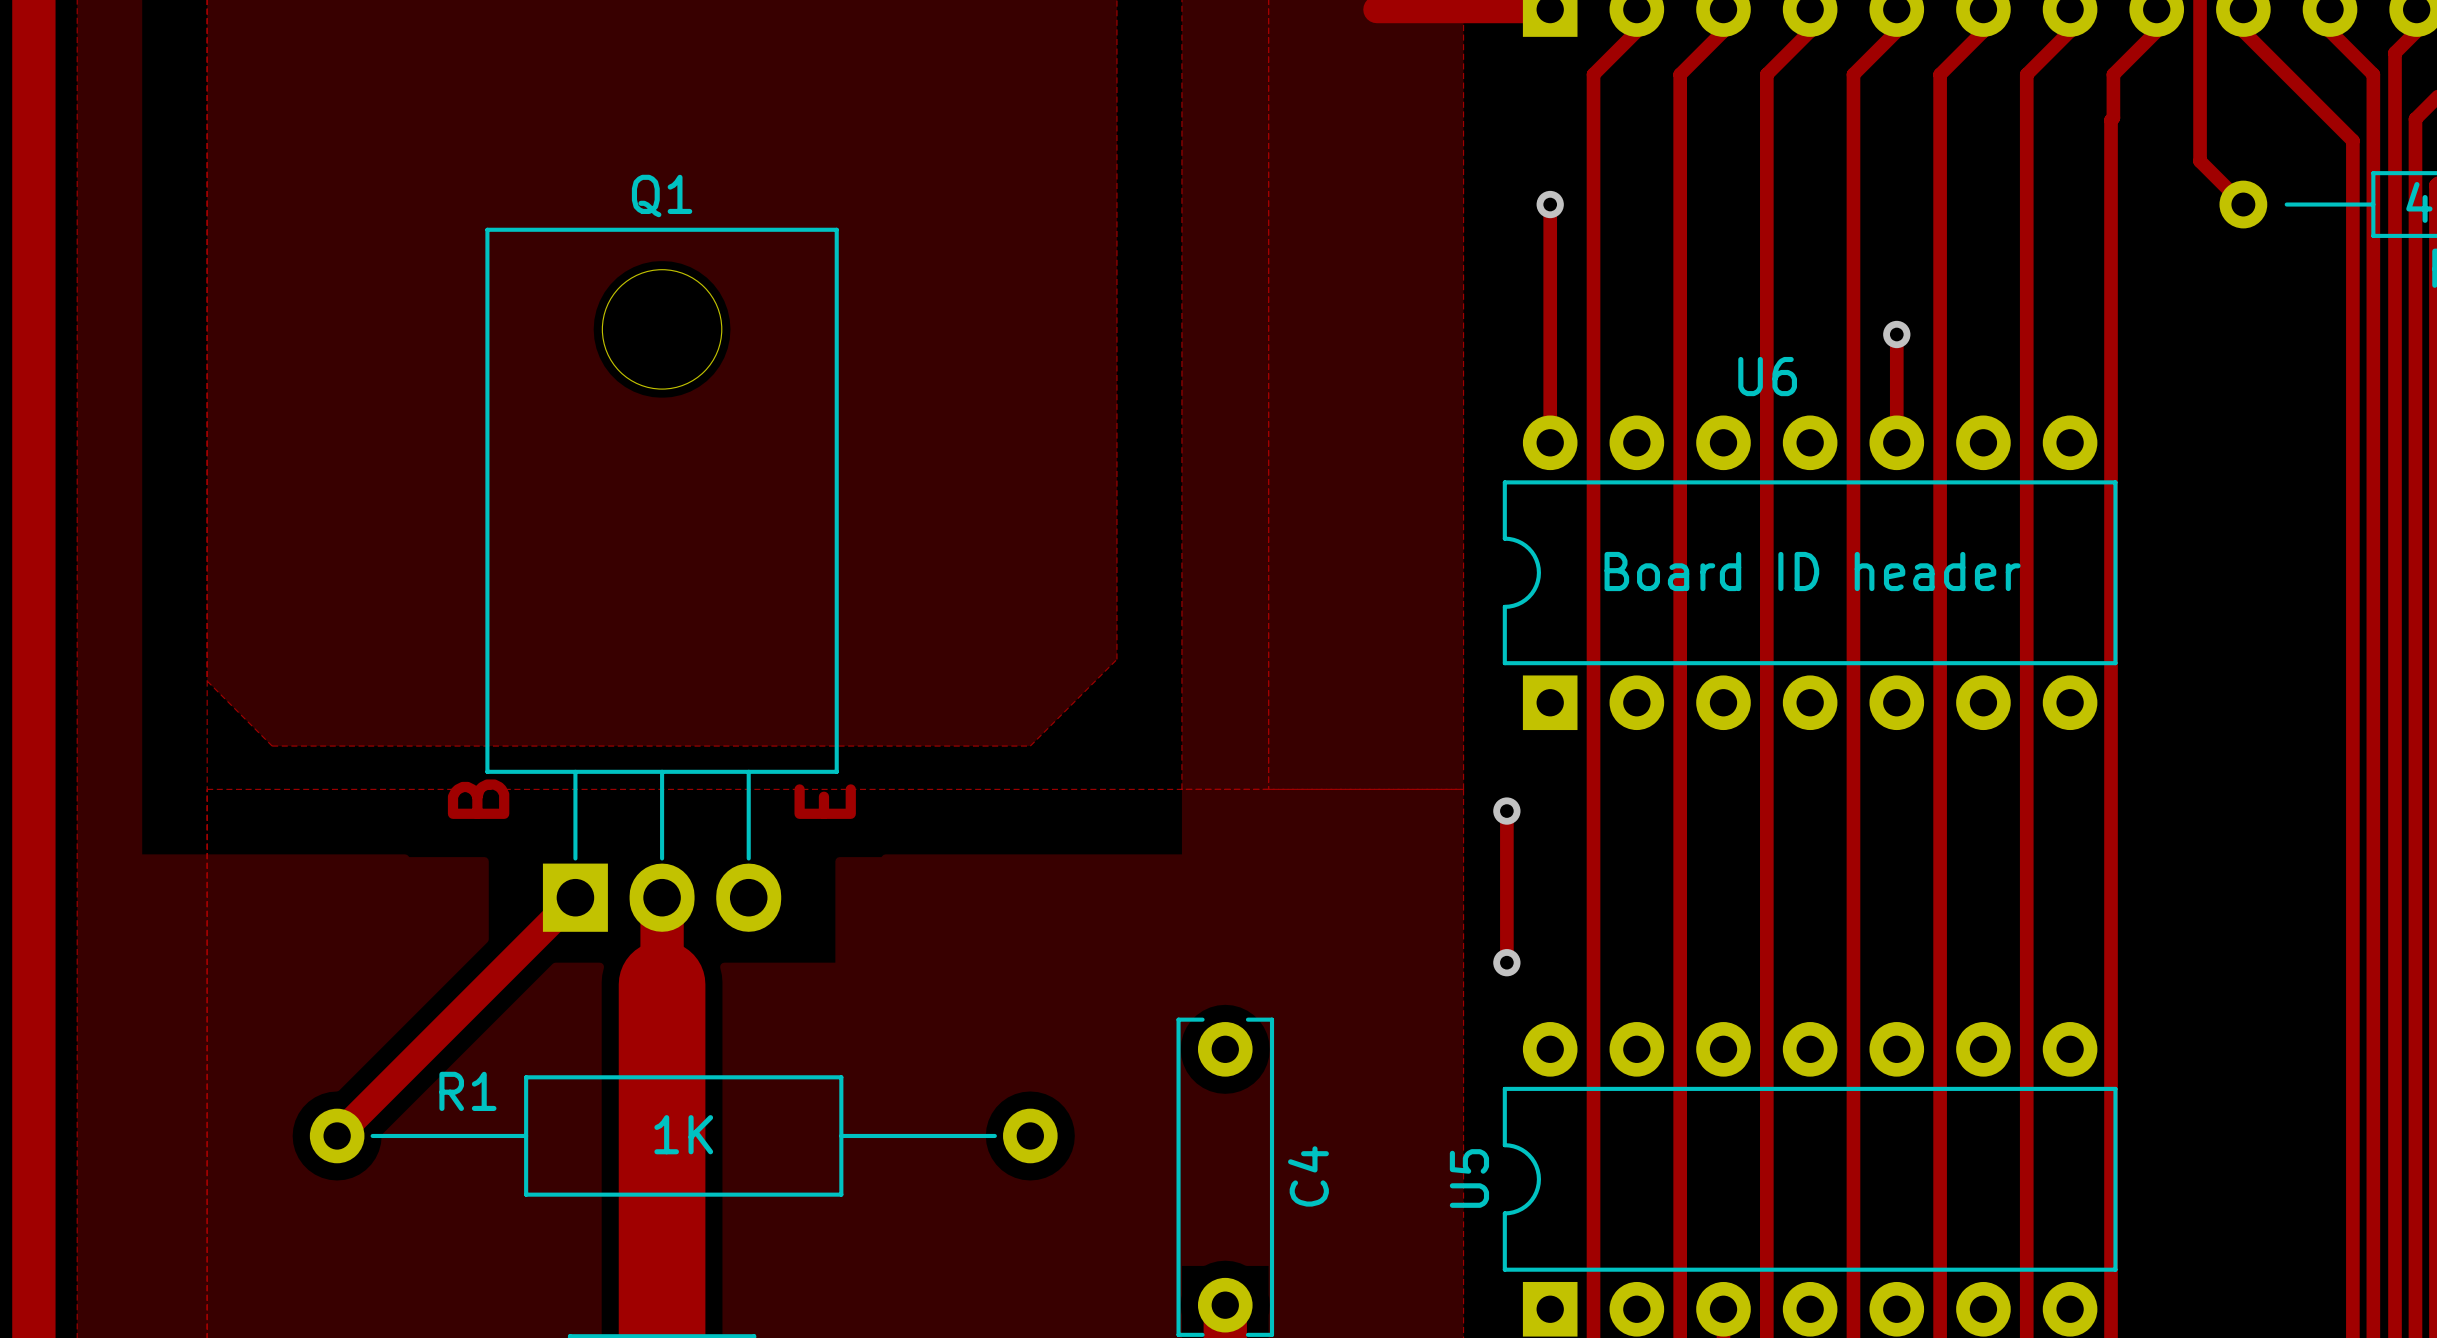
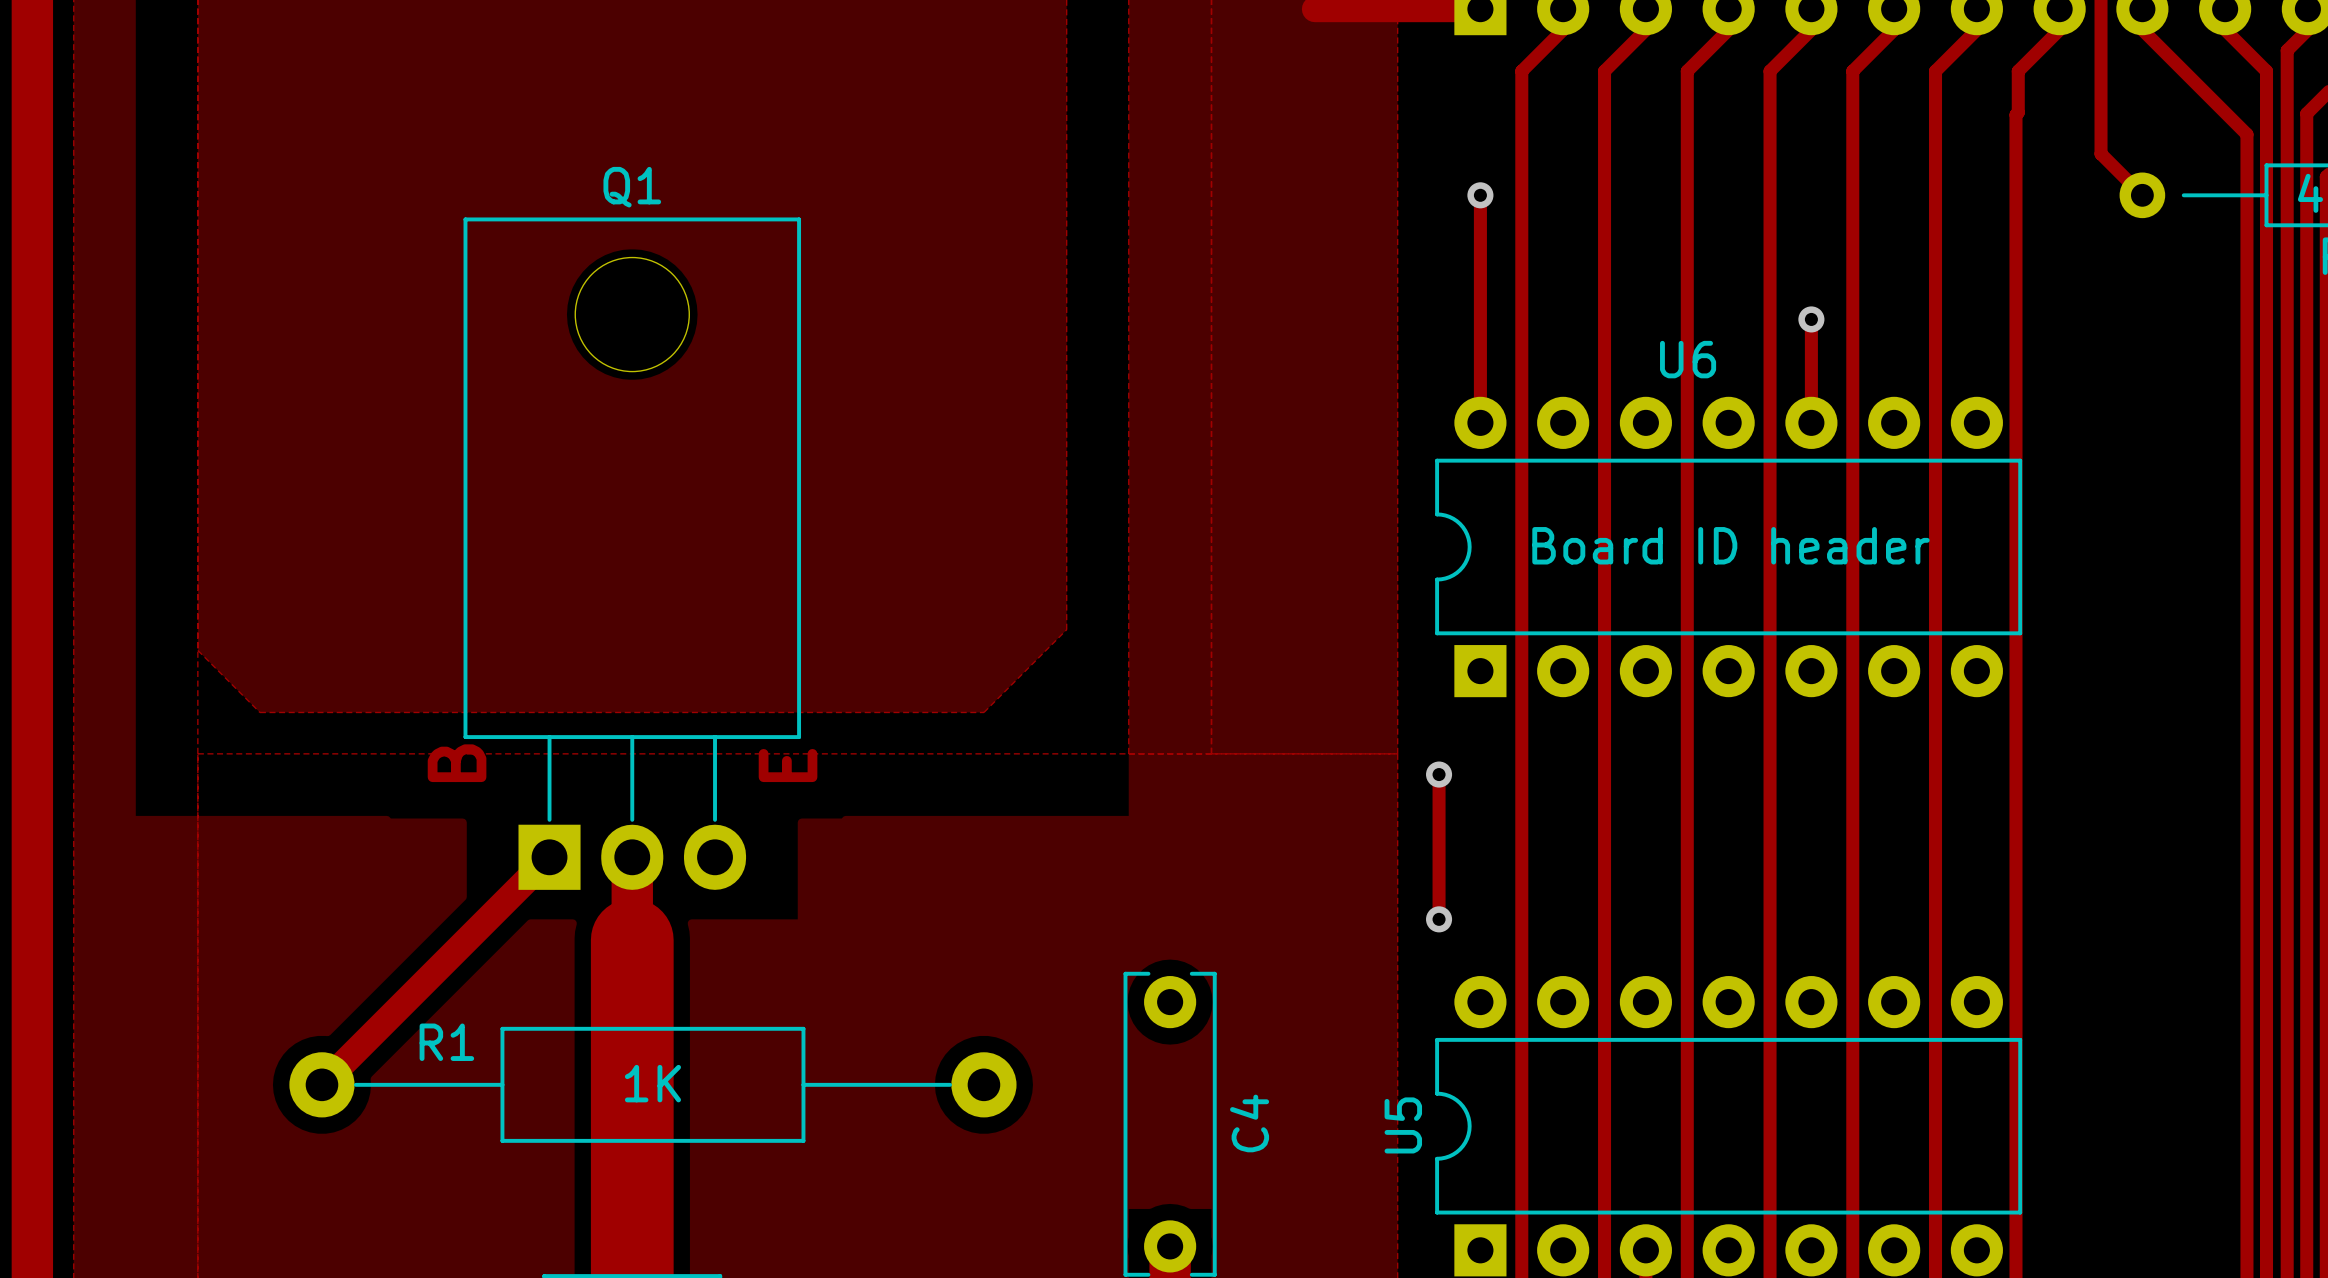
R1 footprint: [309, 1075, 1058, 1197] -> [289, 1026, 1017, 1143]

